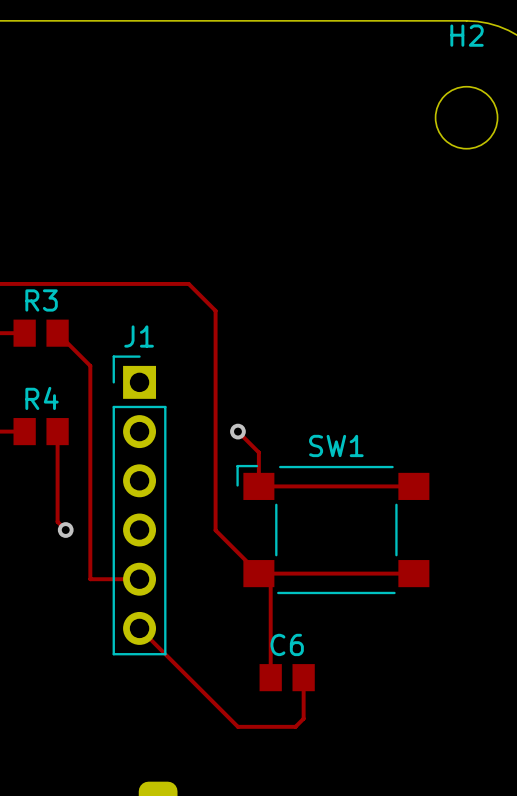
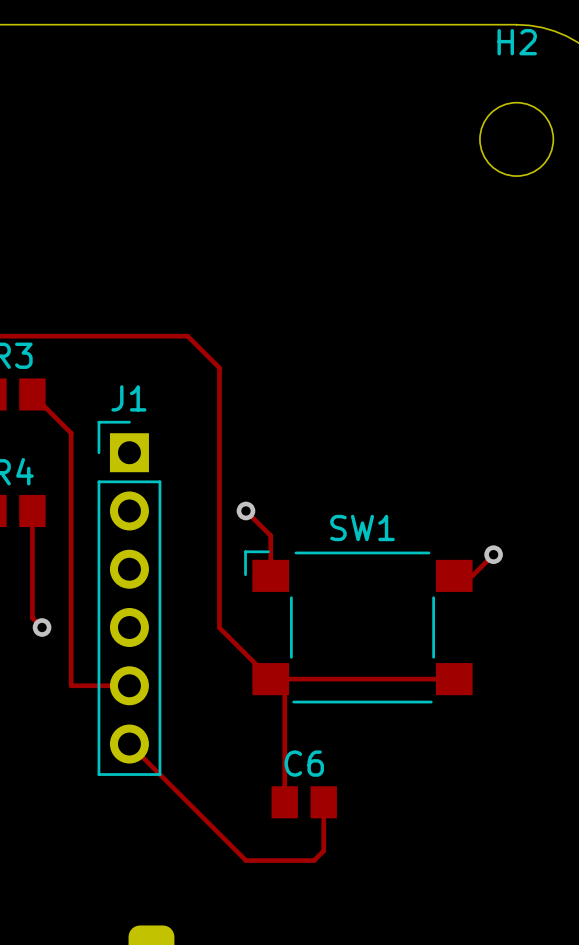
via: none -> (493, 554)
track: (258, 486) (413, 486) -> (493, 554) (472, 575) (454, 575)

